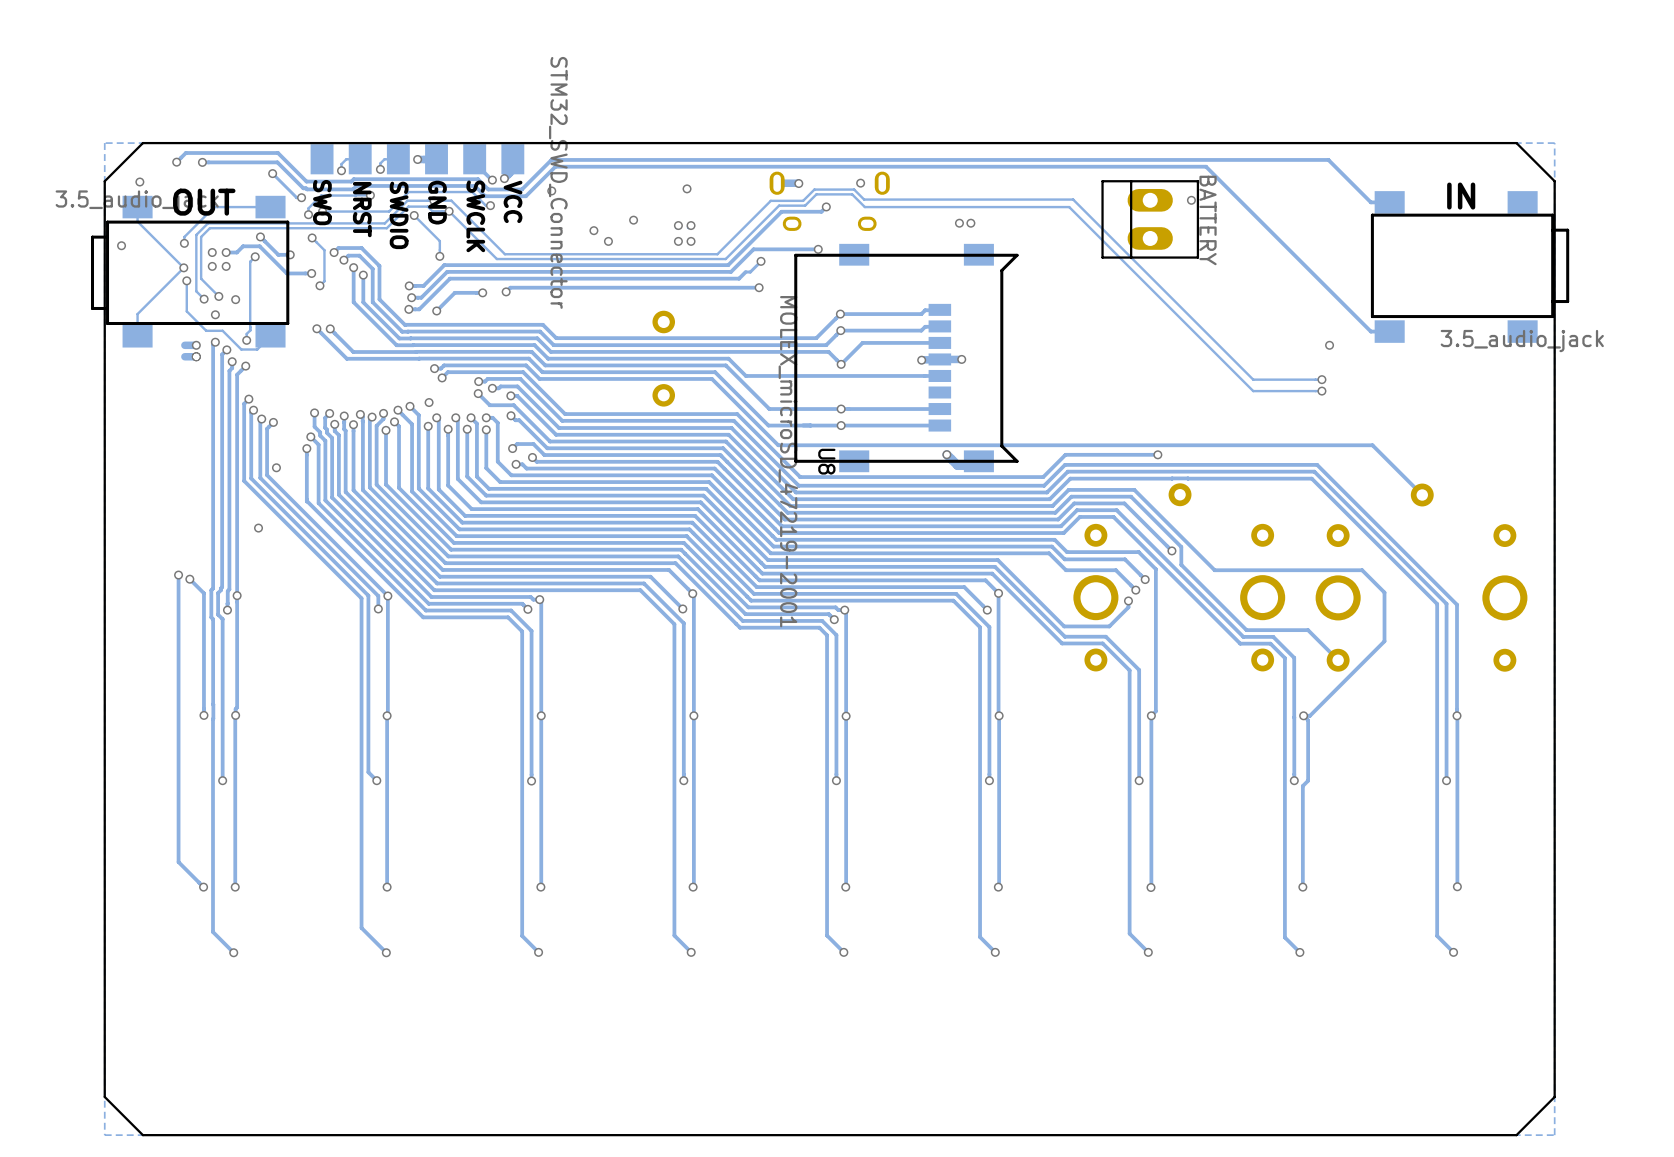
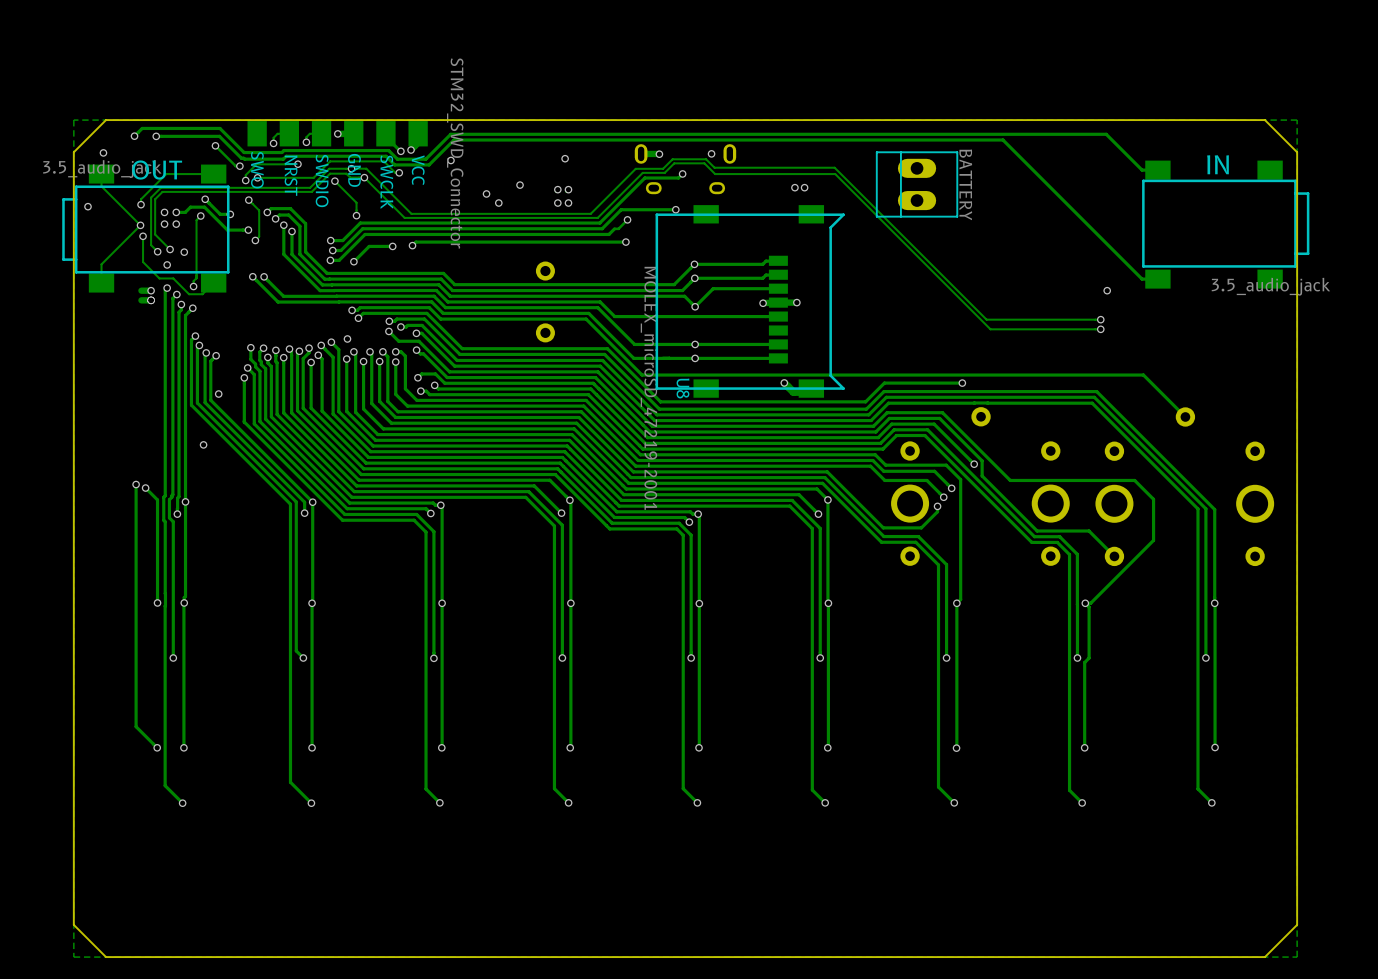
track: (1006, 199) (1073, 199) (1253, 379) -> (834, 167) (986, 319) (1042, 319)
via: (1191, 200) -> none
track: (1007, 207) (1069, 207) (1253, 391) -> (835, 174) (990, 329) (1042, 329)
part position: (1150, 219) -> (917, 184)

